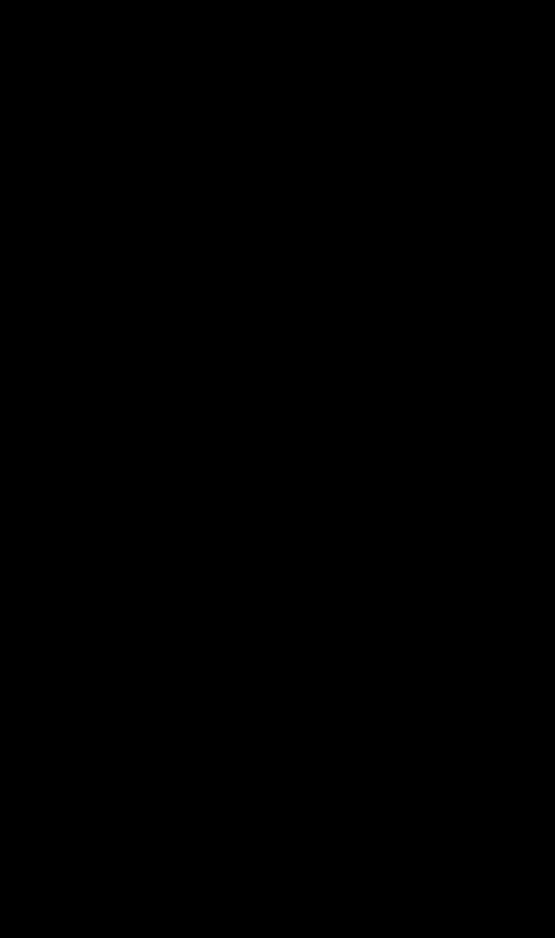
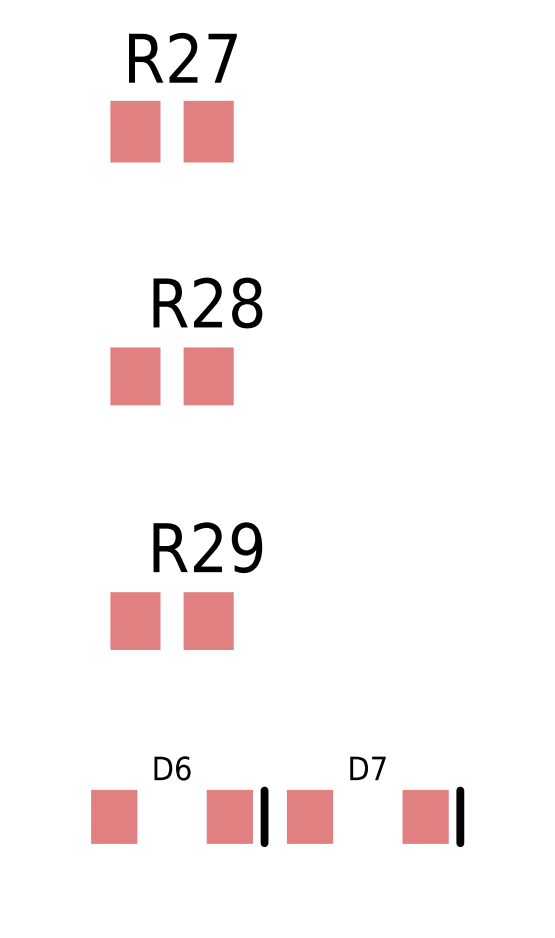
R27: none -> (172, 131)
R28: none -> (172, 376)
R29: none -> (172, 621)
D6: none -> (179, 816)
D7: none -> (375, 816)

